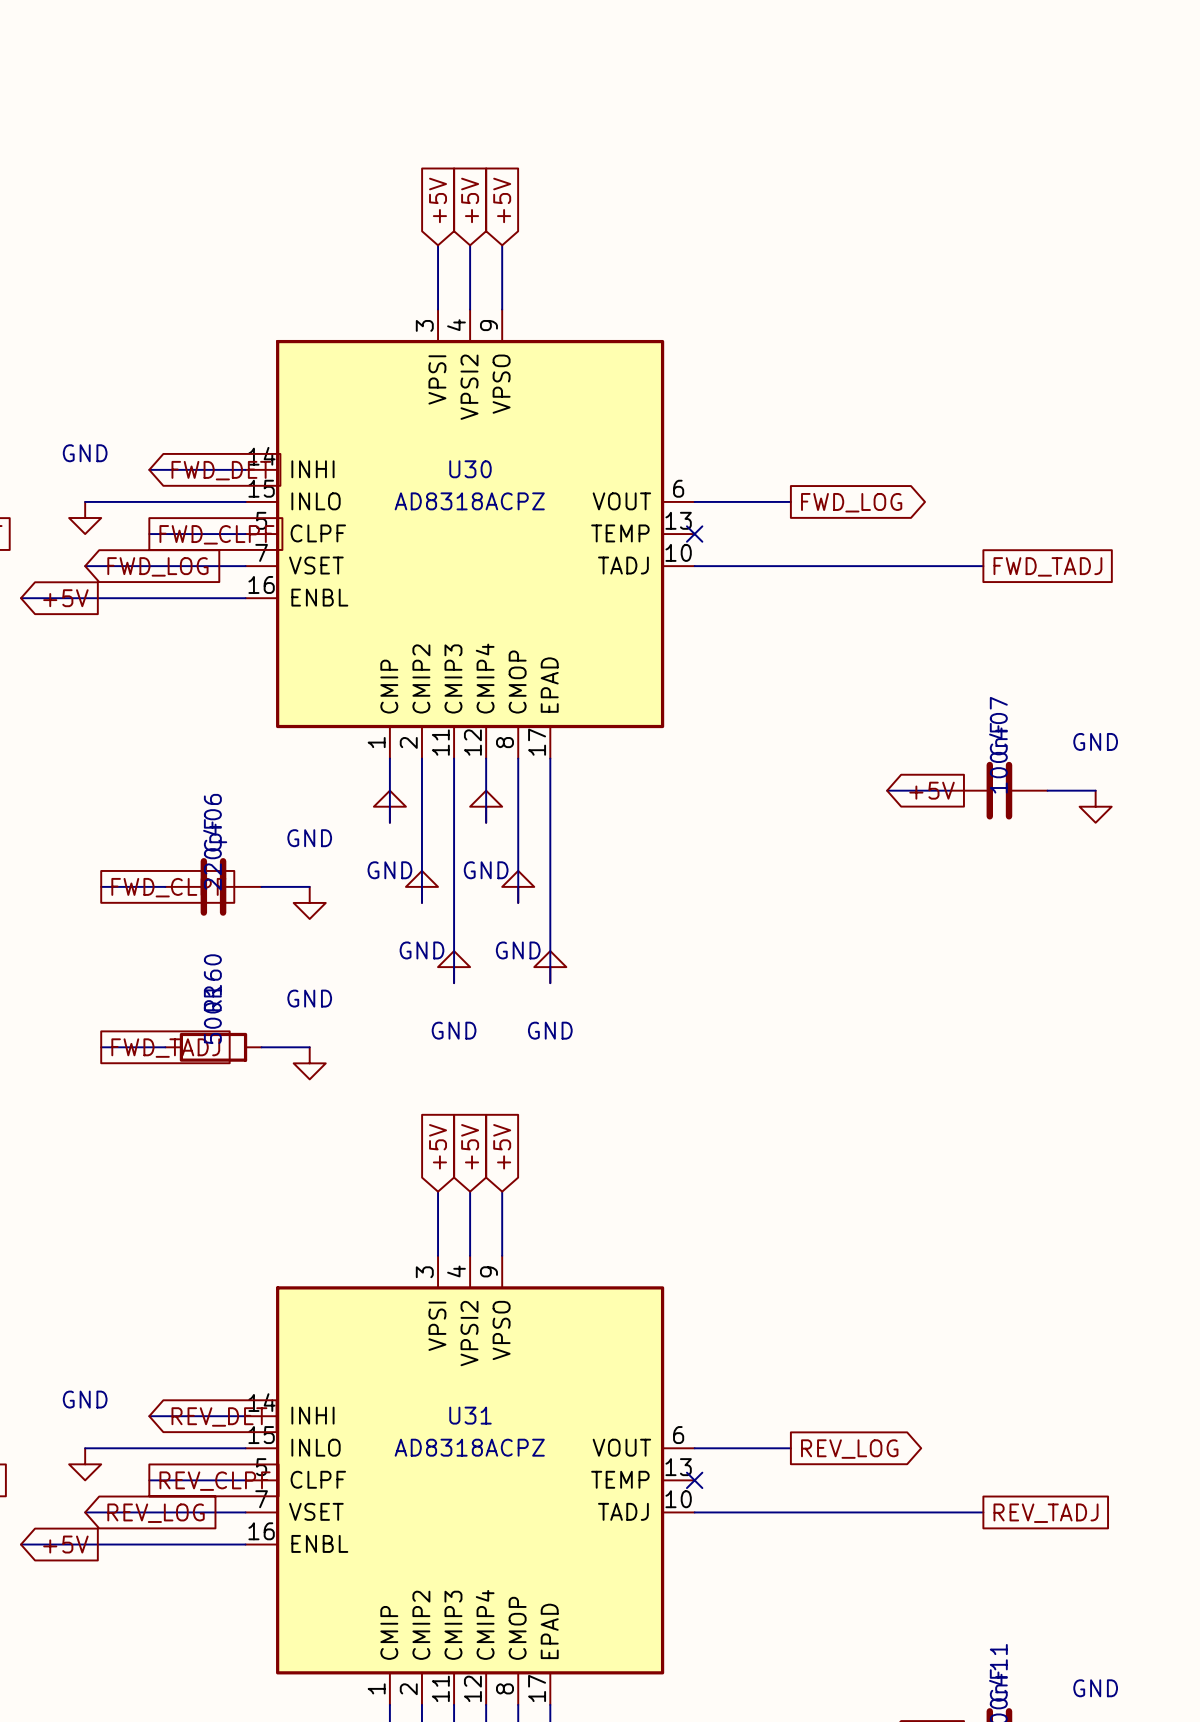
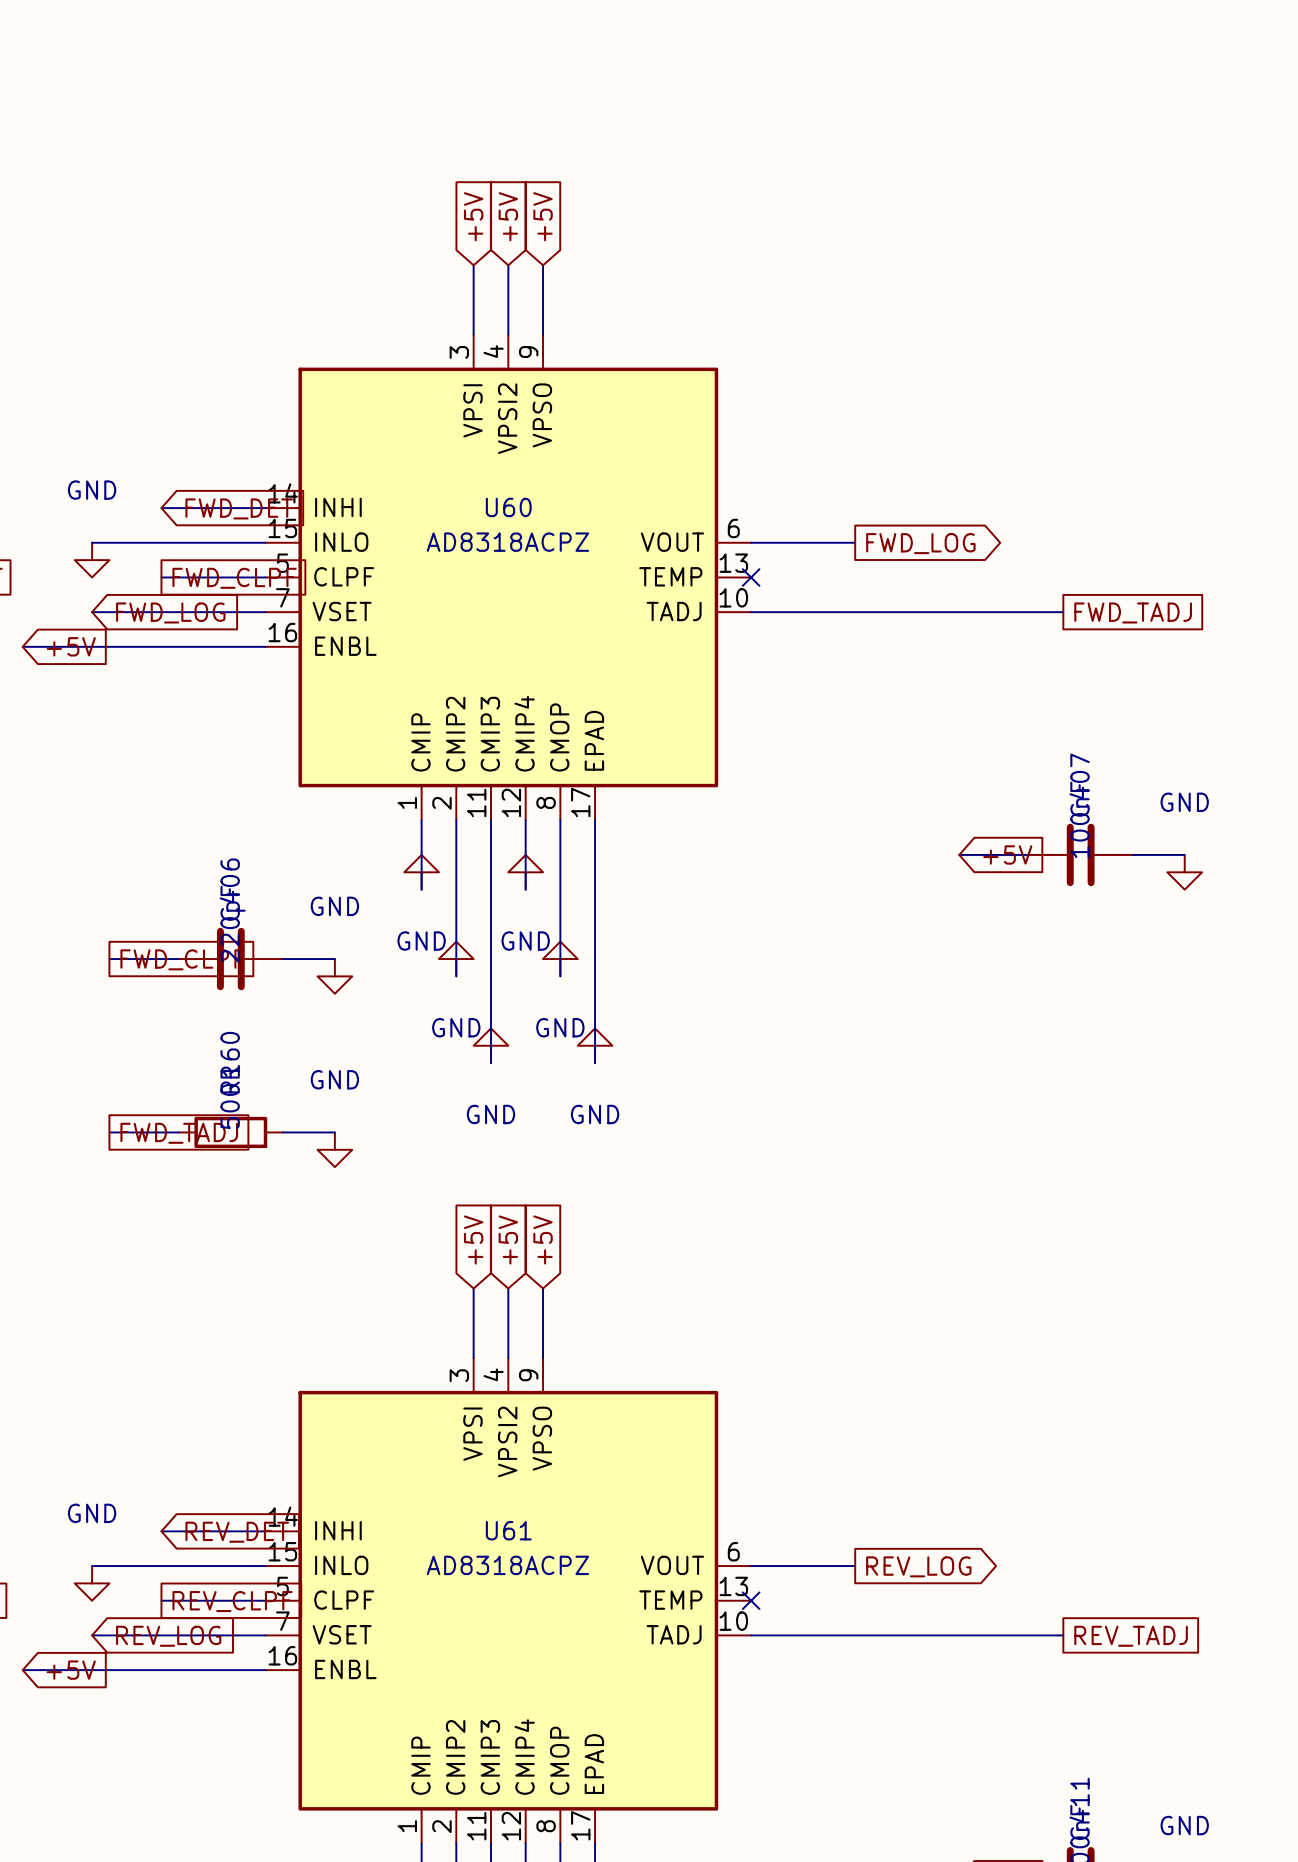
U30 name: U30 (470, 469) -> U60 (508, 507)
U31 name: U31 (470, 1415) -> U61 (508, 1530)

